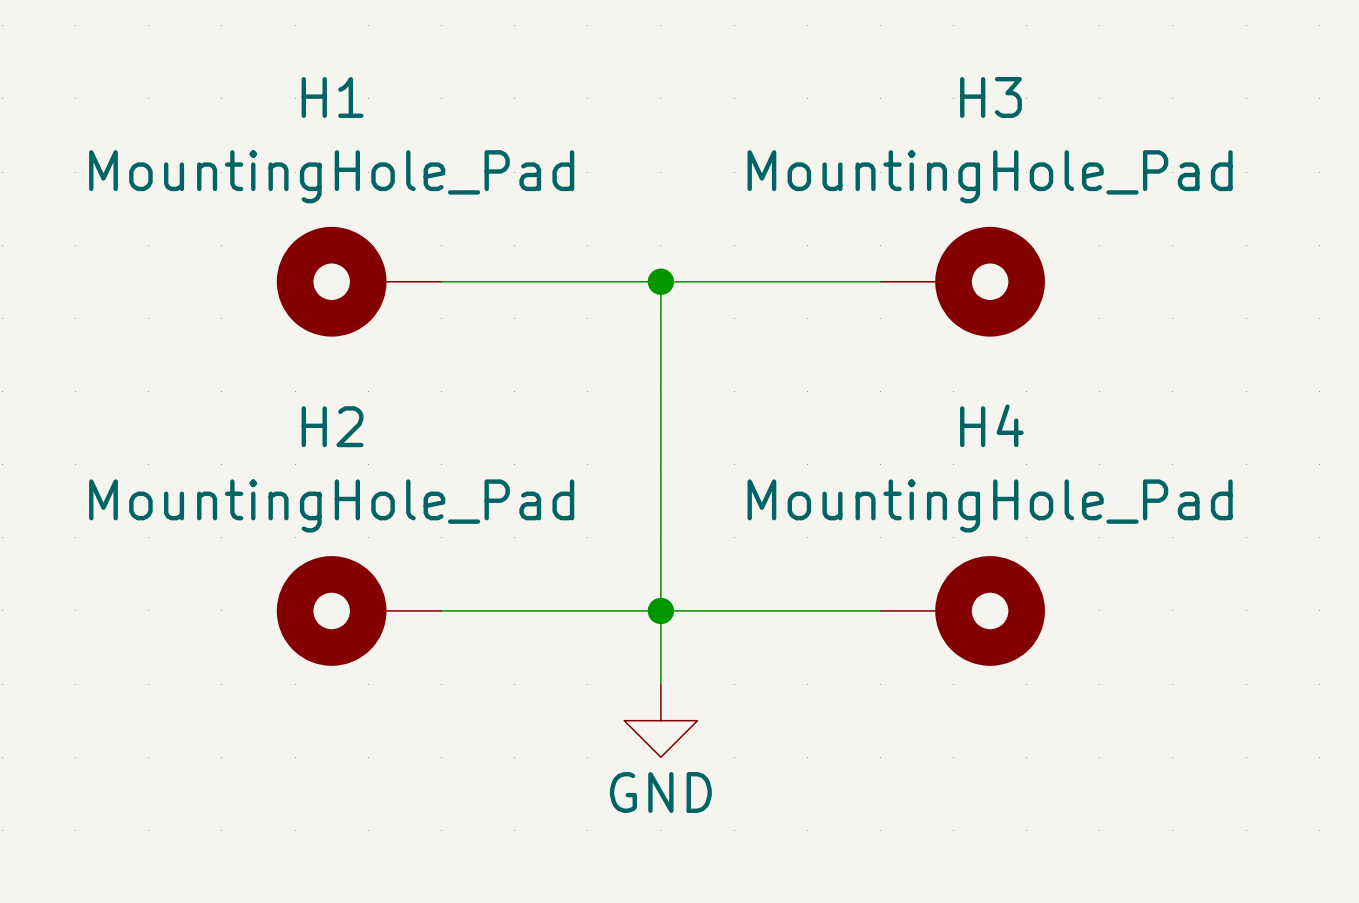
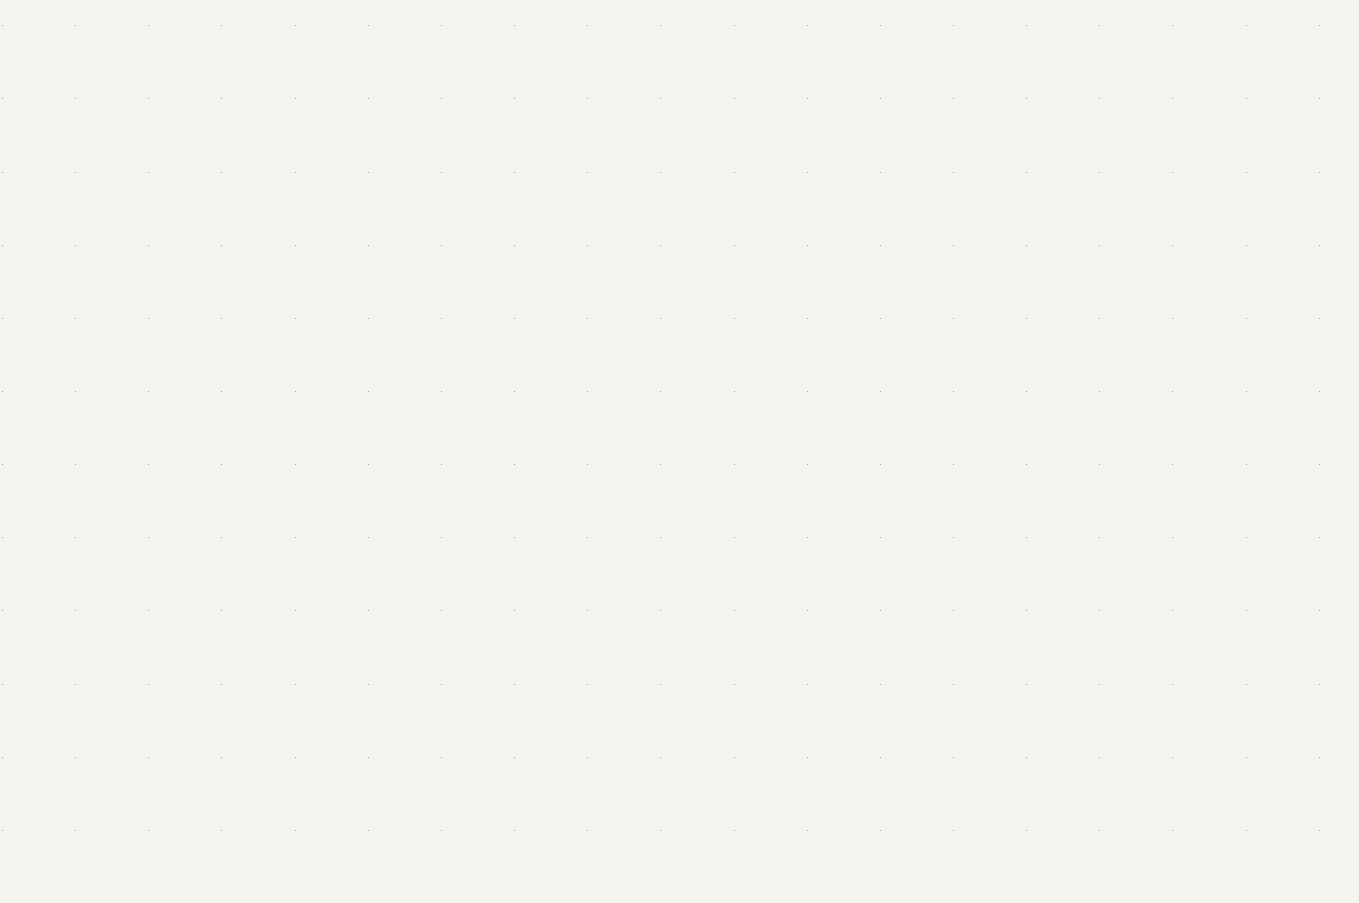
H1: MountingHole_Pad (359, 281) -> none
wire: (441, 281) (880, 281) -> none
wire: (660, 281) (660, 684) -> none
junction: (660, 281) -> none
H3: MountingHole_Pad (962, 281) -> none
H2: MountingHole_Pad (359, 610) -> none
wire: (441, 610) (880, 610) -> none
junction: (660, 610) -> none
H4: MountingHole_Pad (962, 610) -> none
power symbol: GND (660, 720) -> none

